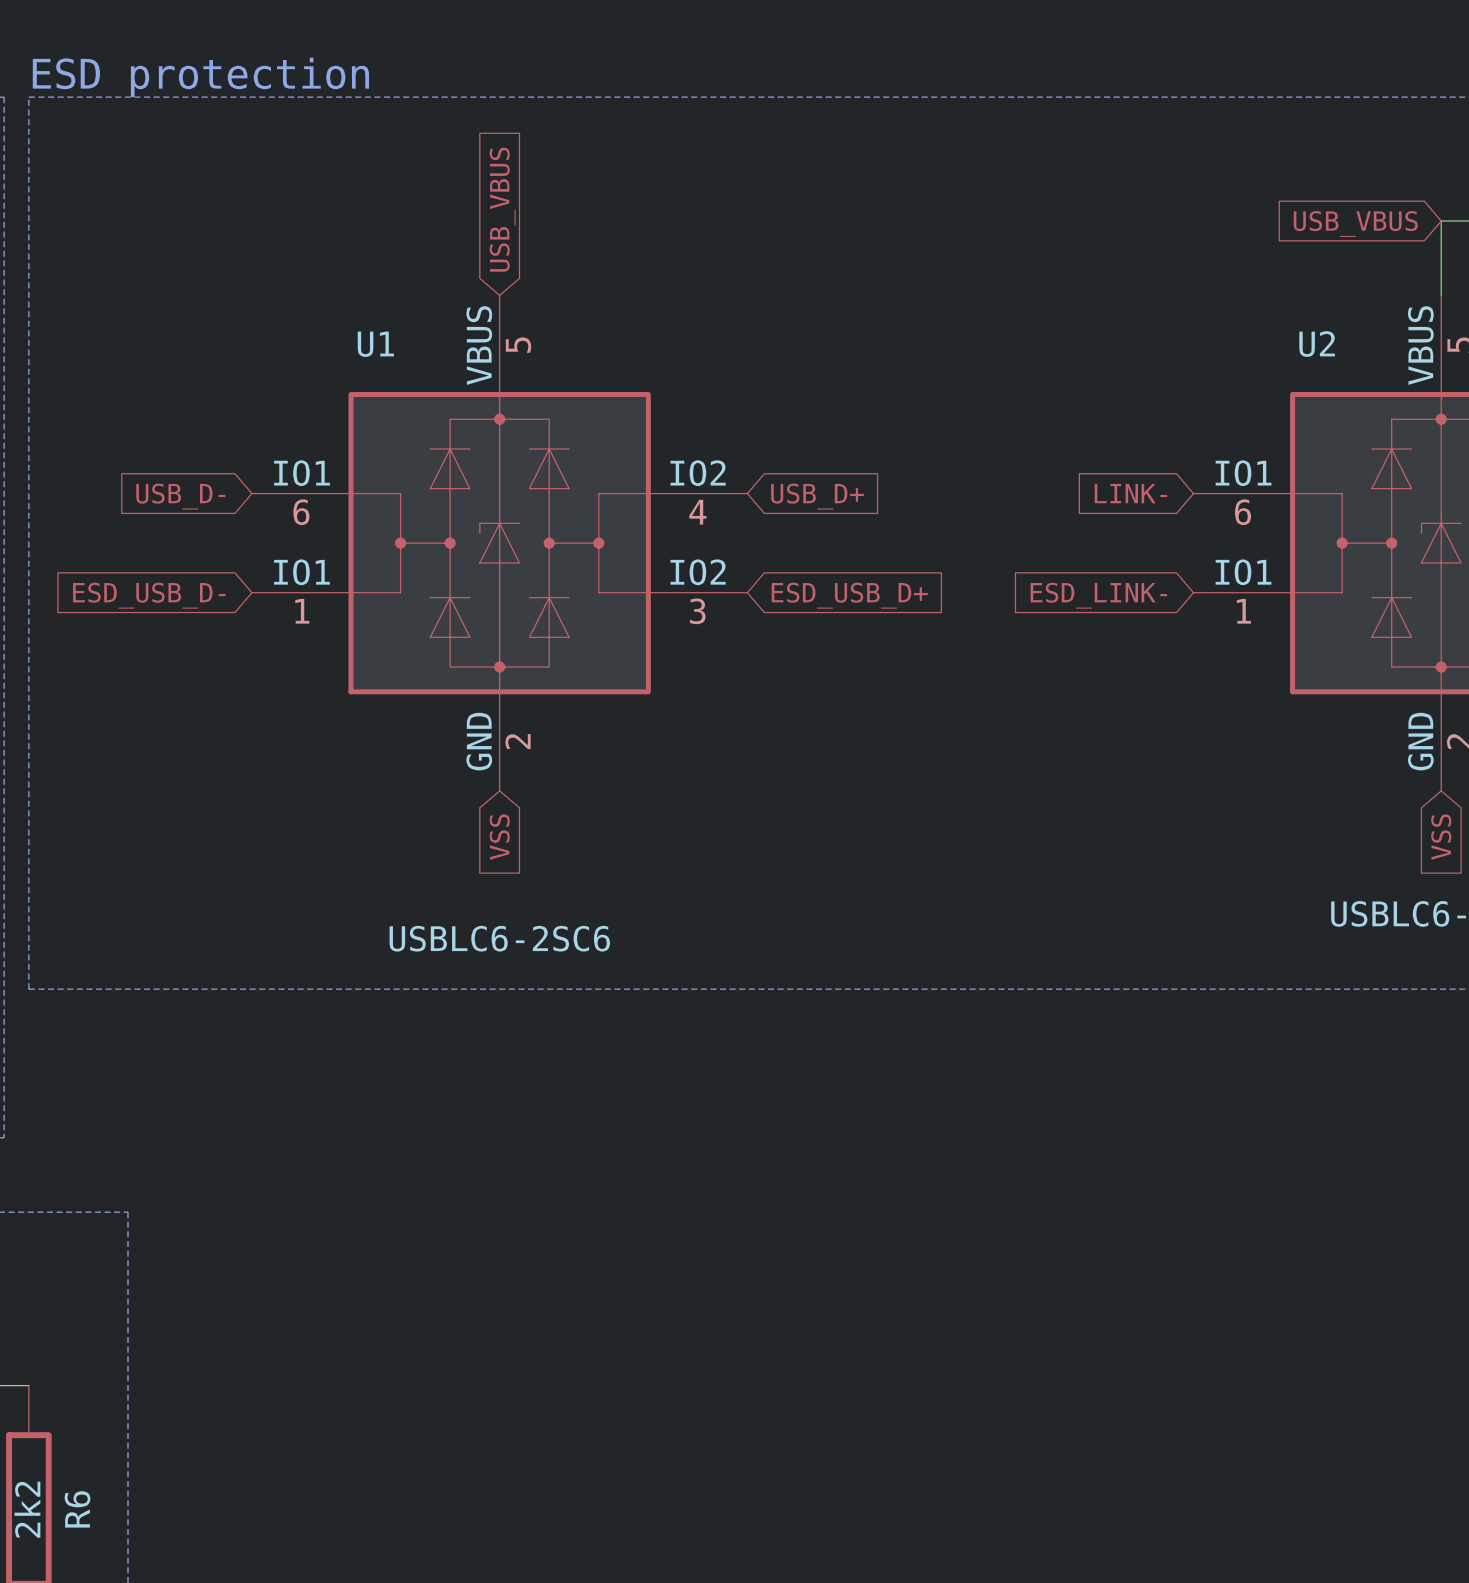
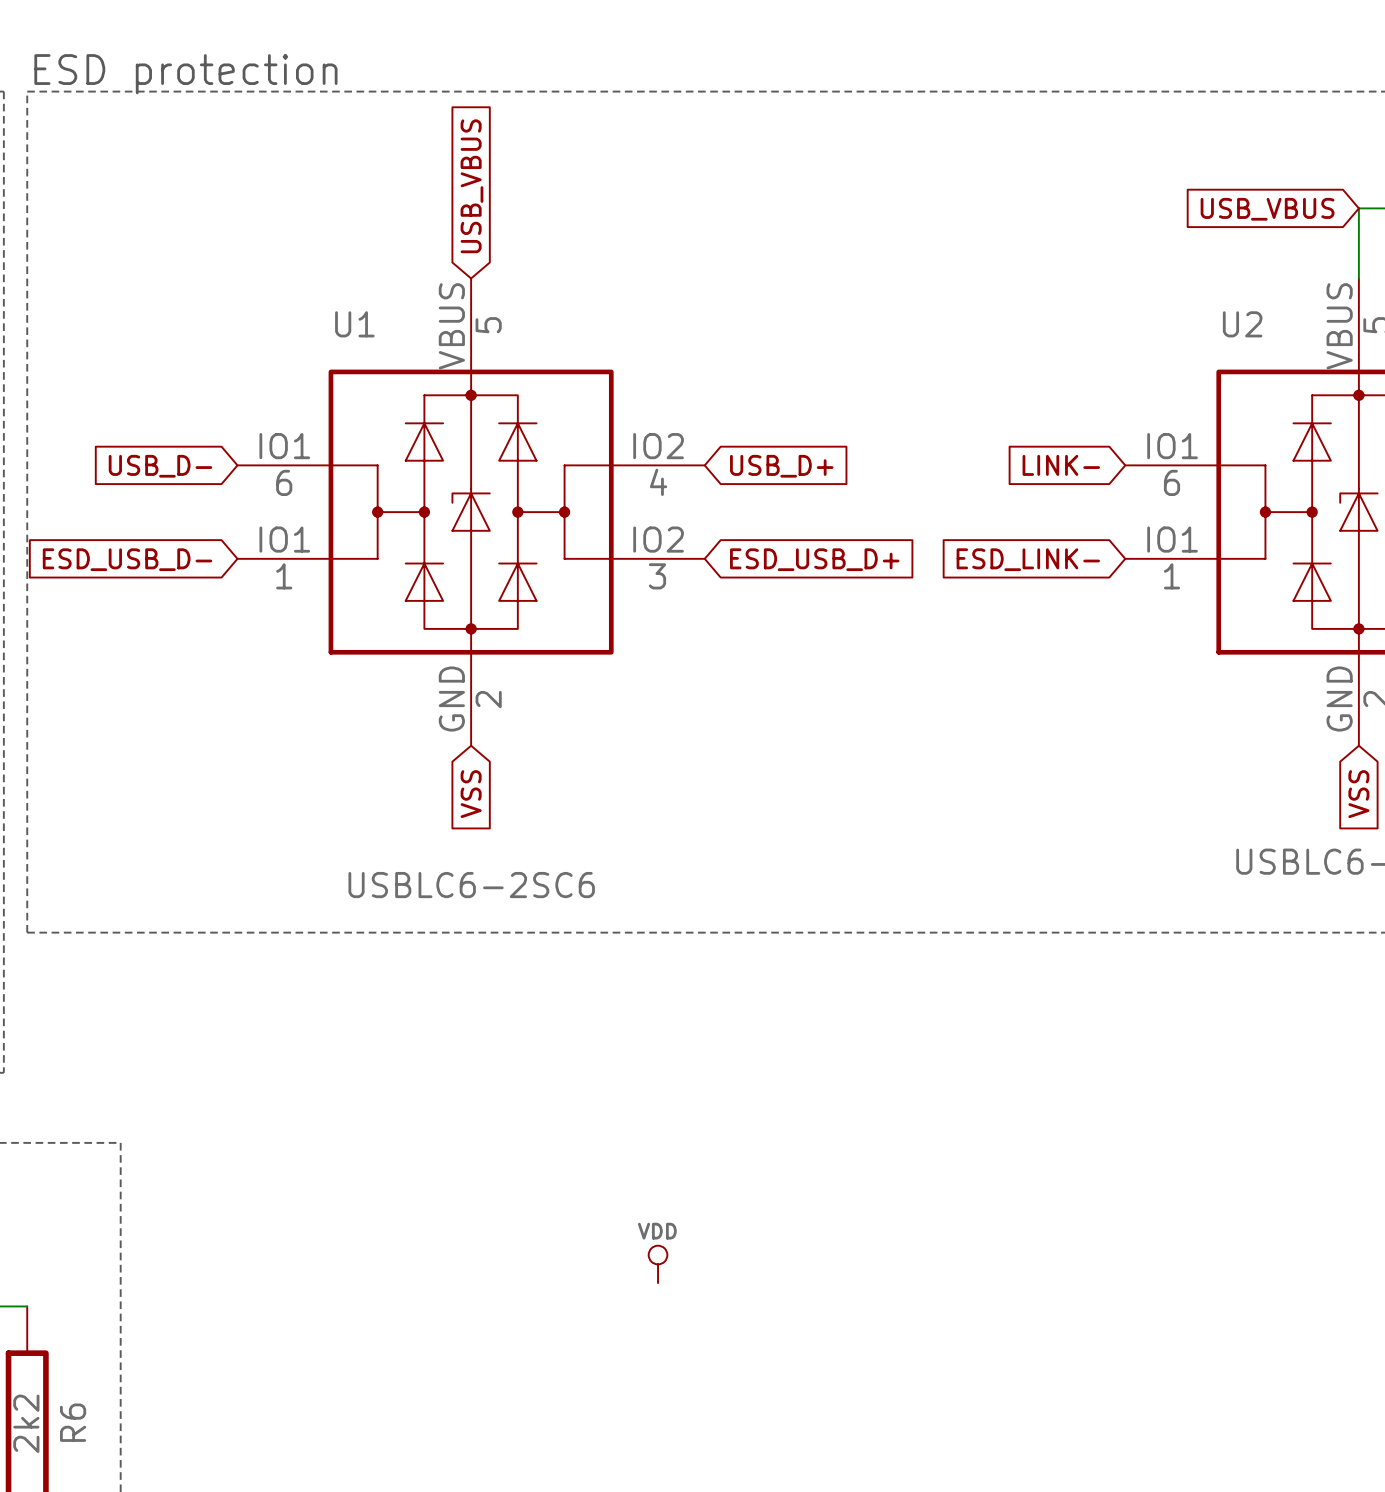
power symbol: none -> VDD (658, 1264)

